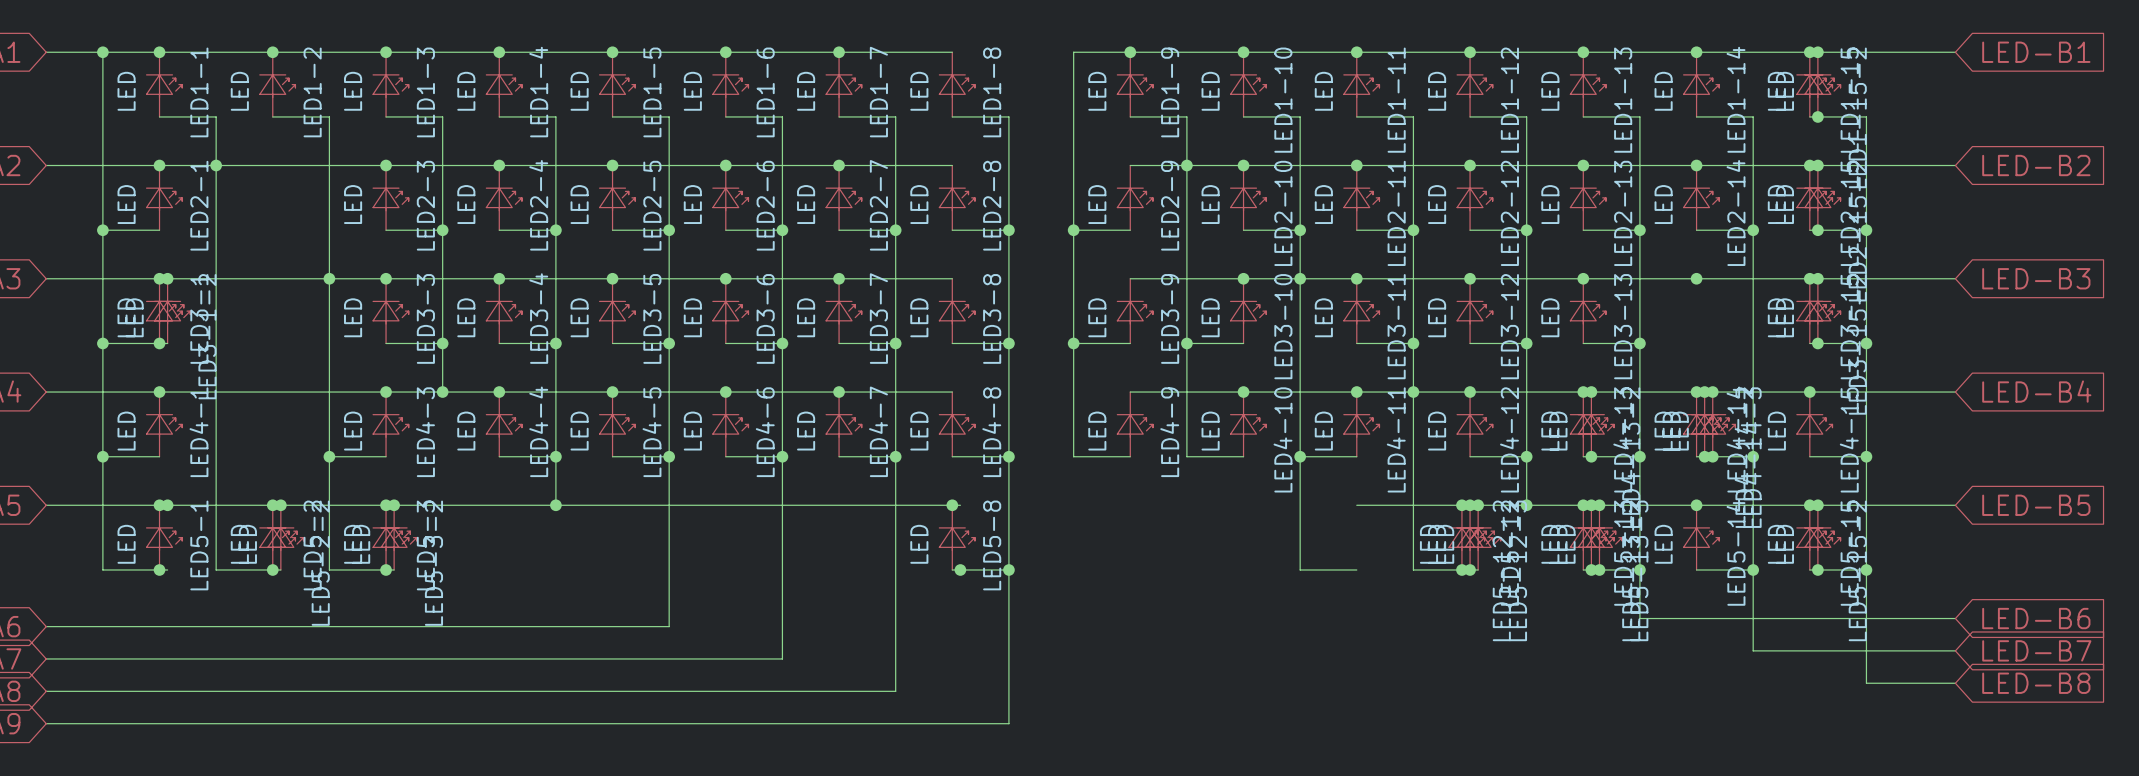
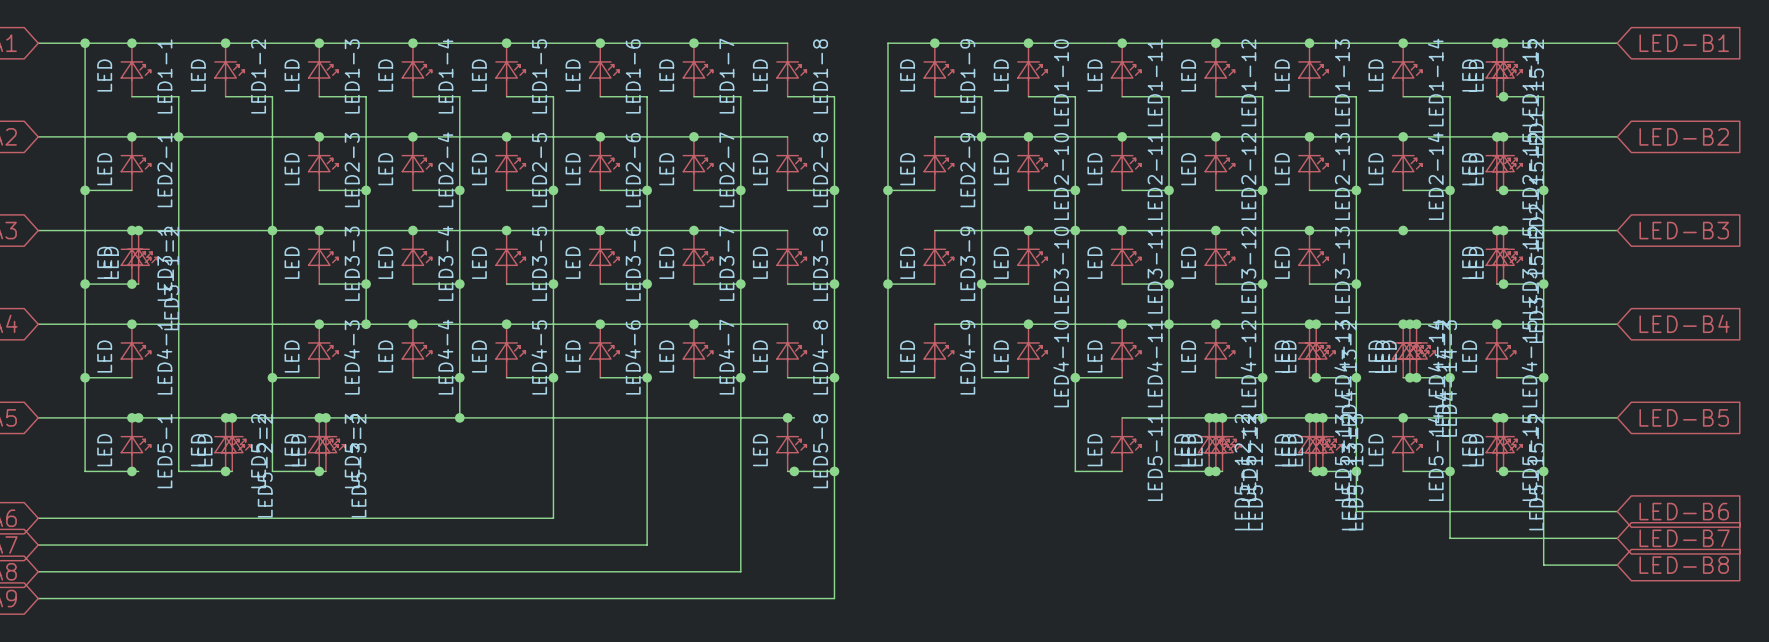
LED5-11: none -> LED (1126, 444)

